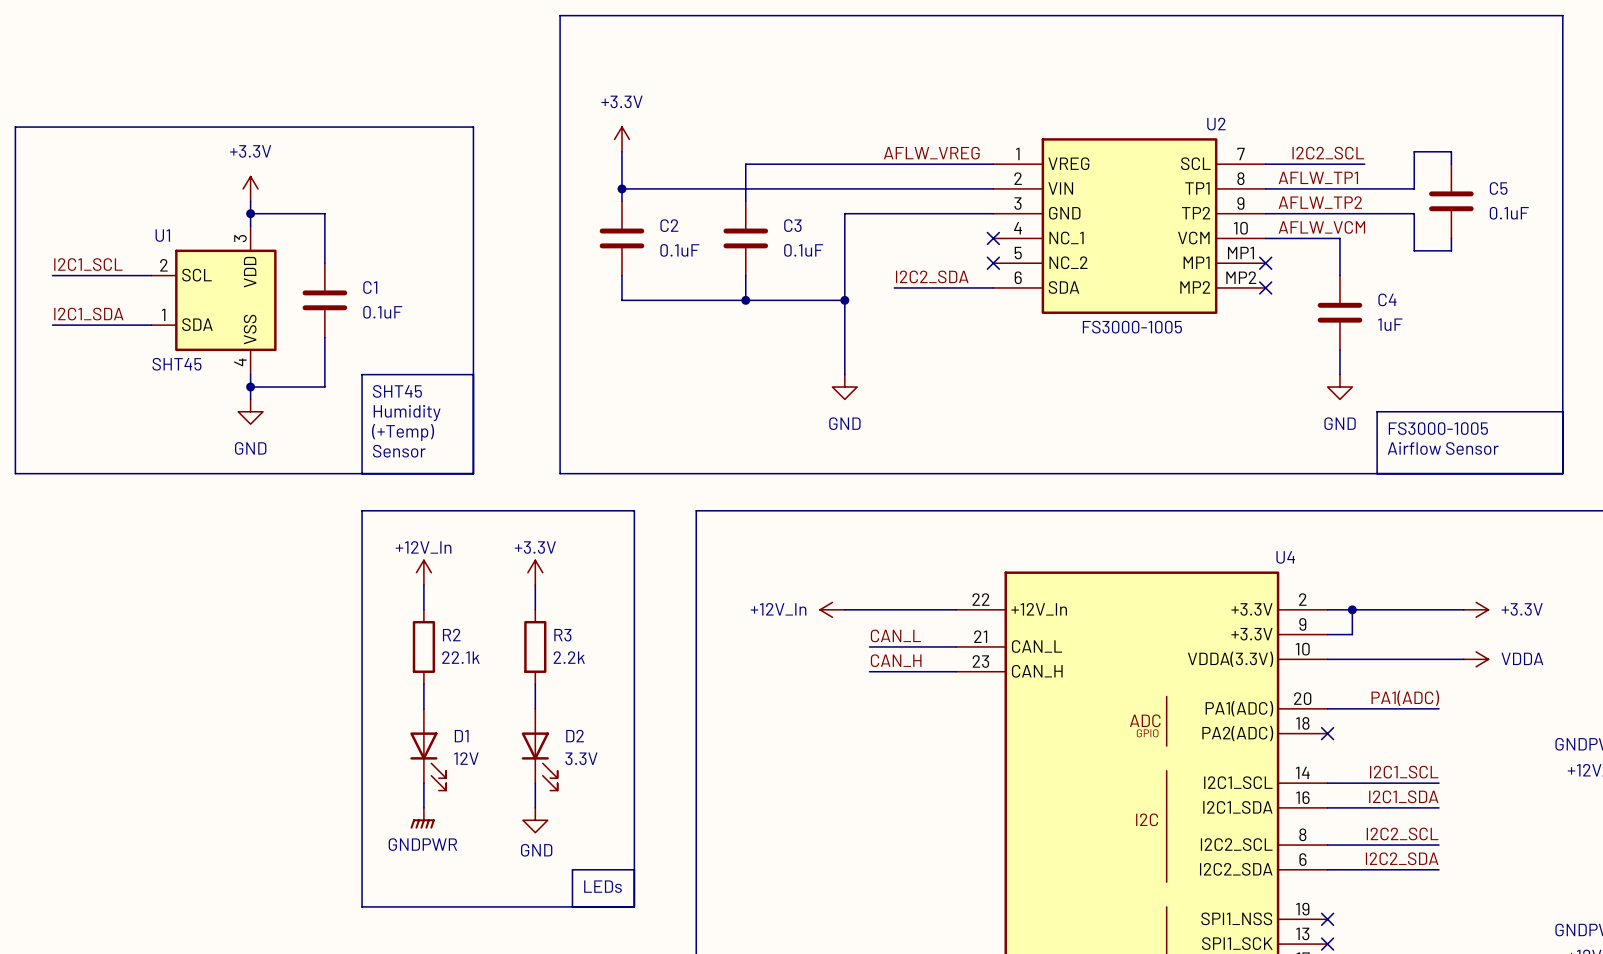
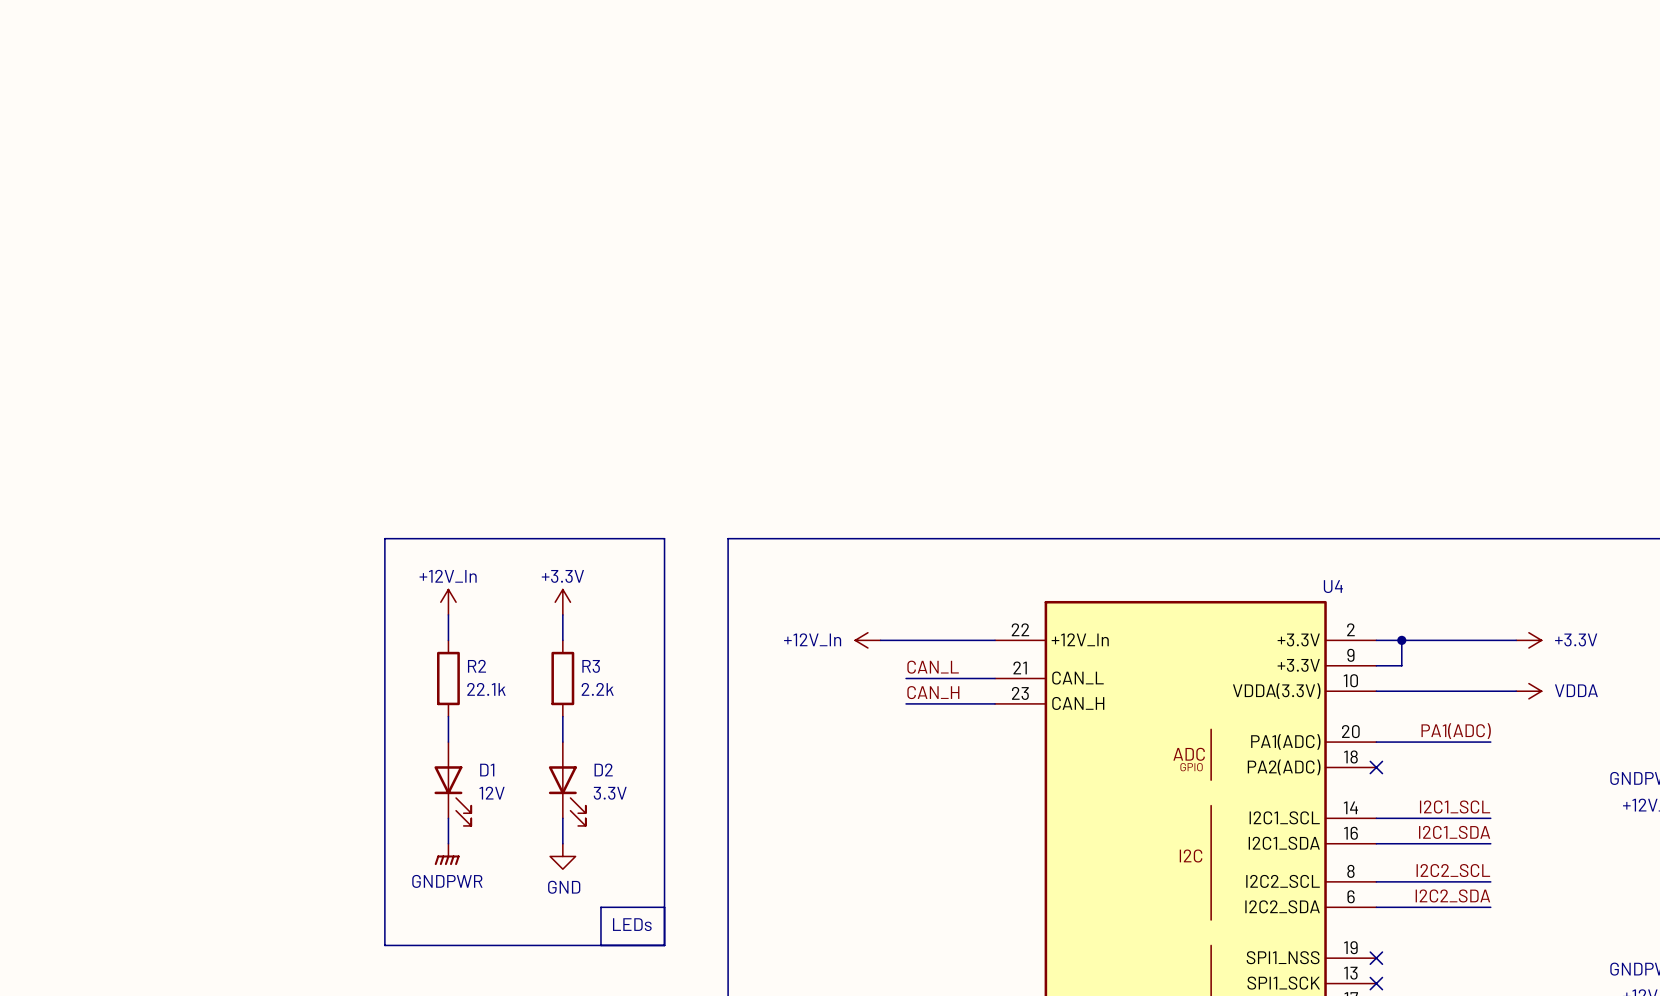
line: (560, 15) (1562, 15) (1562, 473) (560, 473) (560, 15) -> none
line: (15, 127) (473, 127) (473, 473) (15, 473) (15, 127) -> none
power symbol: +3.3V (621, 139) -> none
wire: (621, 151) (621, 201) -> none
label: AFLW_VREG (931, 153) -> none
label: I2C2_SCL (1328, 153) -> none
wire: (993, 164) (745, 164) (745, 201) -> none
wire: (1265, 164) (1364, 164) -> none
wire: (1451, 164) (1451, 151) (1414, 151) (1414, 188) (1265, 188) -> none
label: AFLW_TP1 (1318, 177) -> none
power symbol: +3.3V (250, 188) -> none
wire: (621, 188) (993, 188) -> none
junction: (621, 188) -> none
wire: (250, 201) (250, 226) -> none
C5: 0.1uF (1451, 201) -> none
label: AFLW_TP2 (1320, 202) -> none
wire: (250, 213) (324, 213) (324, 263) -> none
junction: (250, 213) -> none
wire: (993, 213) (844, 213) (844, 374) -> none
wire: (1265, 213) (1414, 213) (1414, 250) (1451, 250) (1451, 238) -> none
U2: FS3000-1005 (1129, 226) -> none
label: AFLW_VCM (1321, 227) -> none
C2: 0.1uF (621, 238) -> none
C3: 0.1uF (745, 238) -> none
no-connect mark: (993, 238) -> none
wire: (1265, 238) (1339, 238) (1339, 275) -> none
no-connect mark: (993, 263) -> none
no-connect mark: (1265, 263) -> none
label: I2C1_SCL (88, 264) -> none
wire: (52, 275) (151, 275) -> none
wire: (621, 275) (621, 300) (844, 300) -> none
wire: (745, 275) (745, 300) -> none
label: I2C2_SDA (932, 276) -> none
wire: (894, 287) (993, 287) -> none
no-connect mark: (1265, 287) -> none
U1: SHT45 (214, 300) -> none
C1: 0.1uF (324, 300) -> none
junction: (745, 300) -> none
junction: (844, 300) -> none
C4: 1uF (1339, 312) -> none
label: I2C1_SDA (88, 314) -> none
wire: (52, 325) (151, 325) -> none
wire: (324, 337) (324, 387) (250, 387) -> none
wire: (1339, 349) (1339, 374) -> none
wire: (250, 374) (250, 399) -> none
line: (473, 374) (362, 374) (362, 473) -> none
junction: (250, 387) -> none
power symbol: GND (844, 387) -> none
power symbol: GND (1339, 387) -> none
text: SHT45 (397, 391) -> none
power symbol: GND (250, 411) -> none
line: (1562, 411) (1377, 411) (1377, 473) -> none
text: Humidity (407, 413) -> none
text: FS3000-1005 (1438, 428) -> none
text: (+Temp) (403, 432) -> none
text: Airflow Sensor (1443, 448) -> none
text: Sensor (399, 451) -> none

